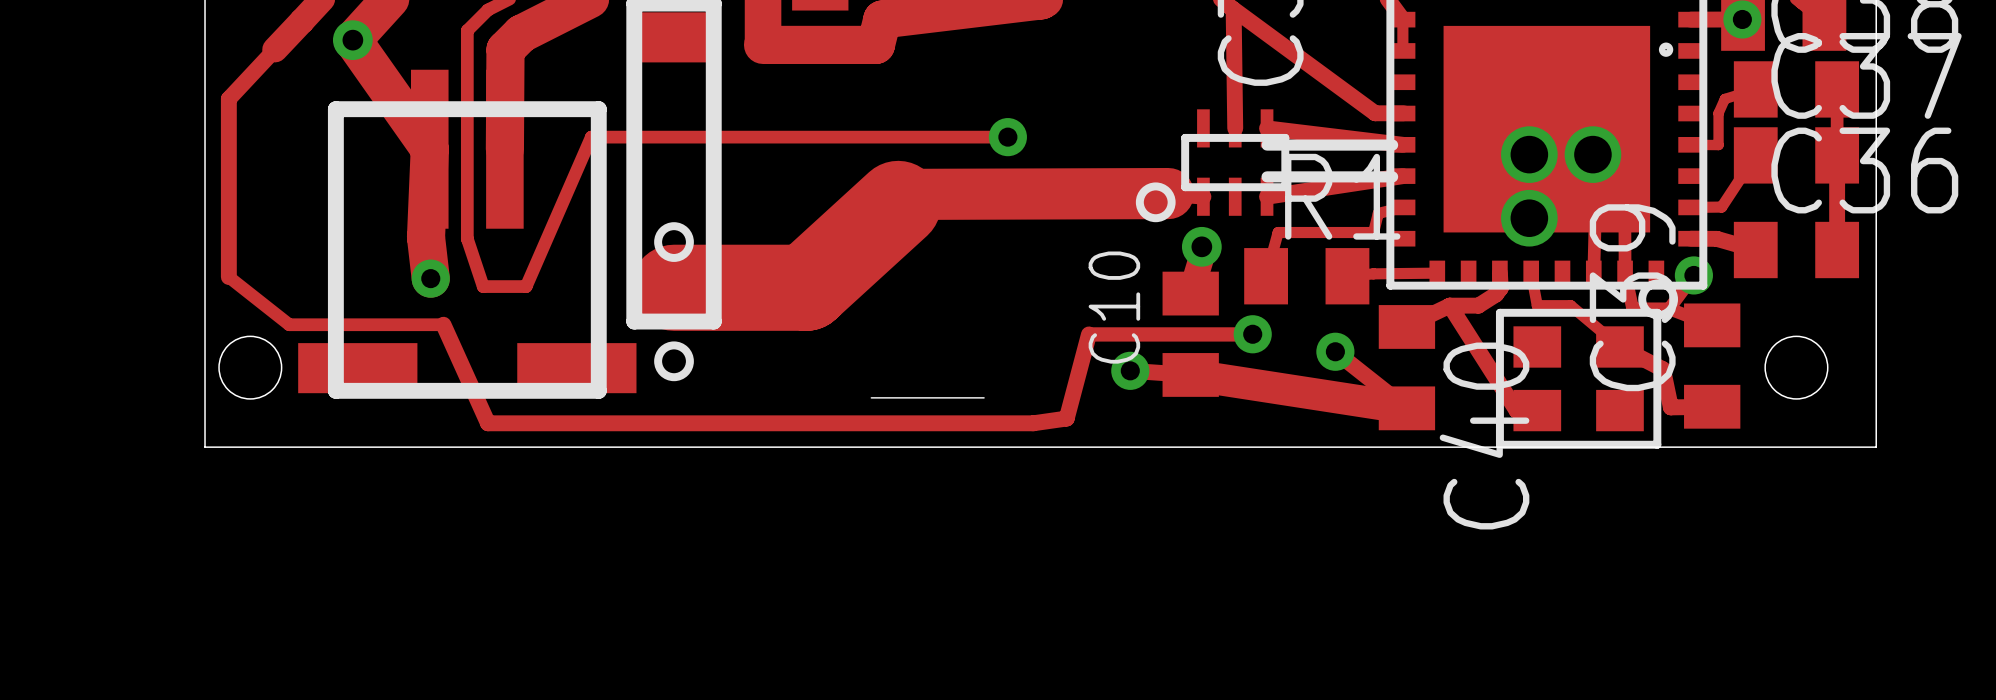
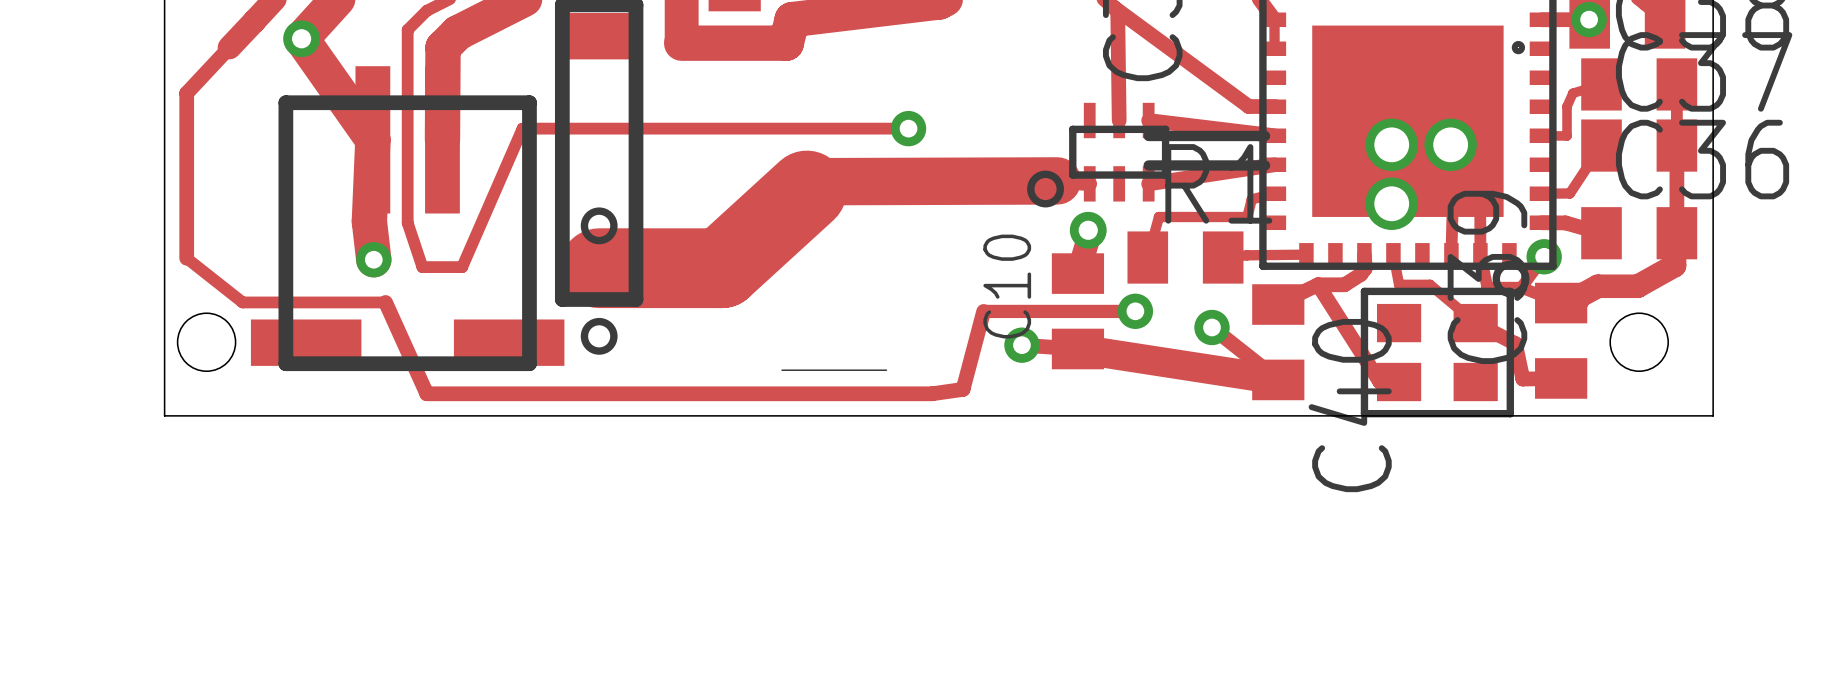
track: none -> (1676, 233) (1674, 237) (1674, 265) (1637, 286) (1597, 286) (1574, 298)

